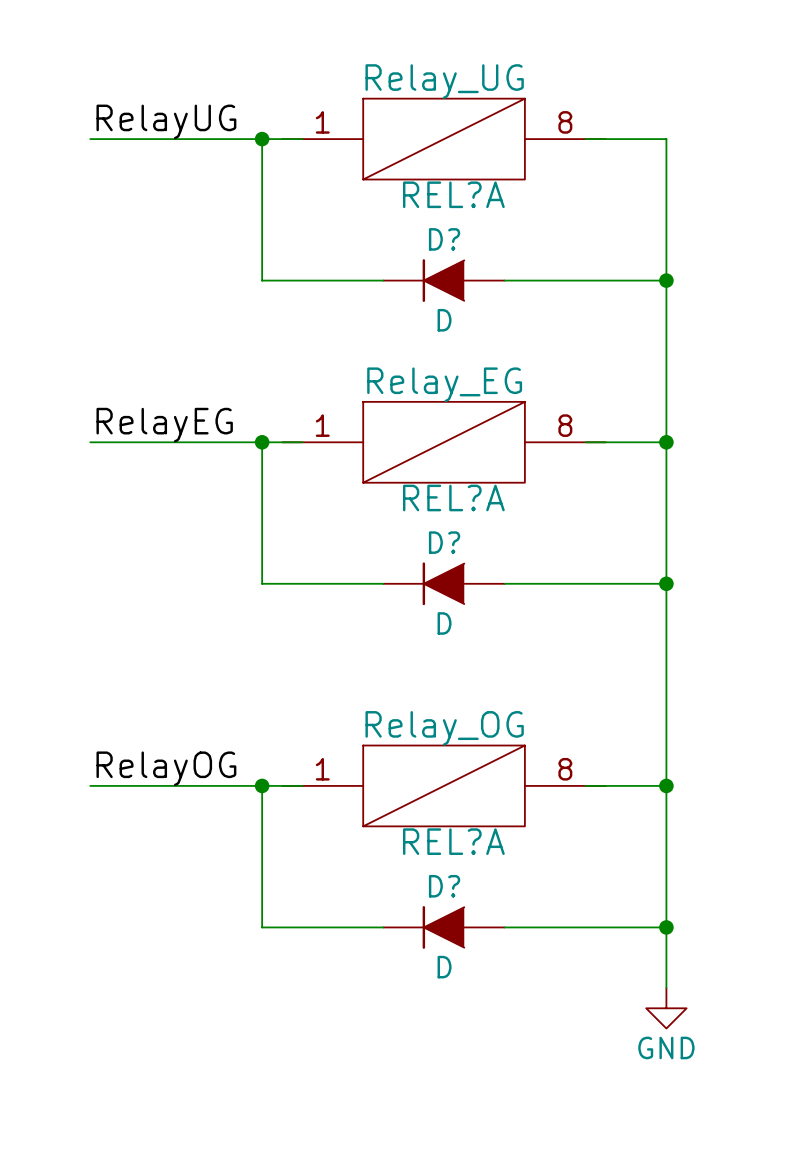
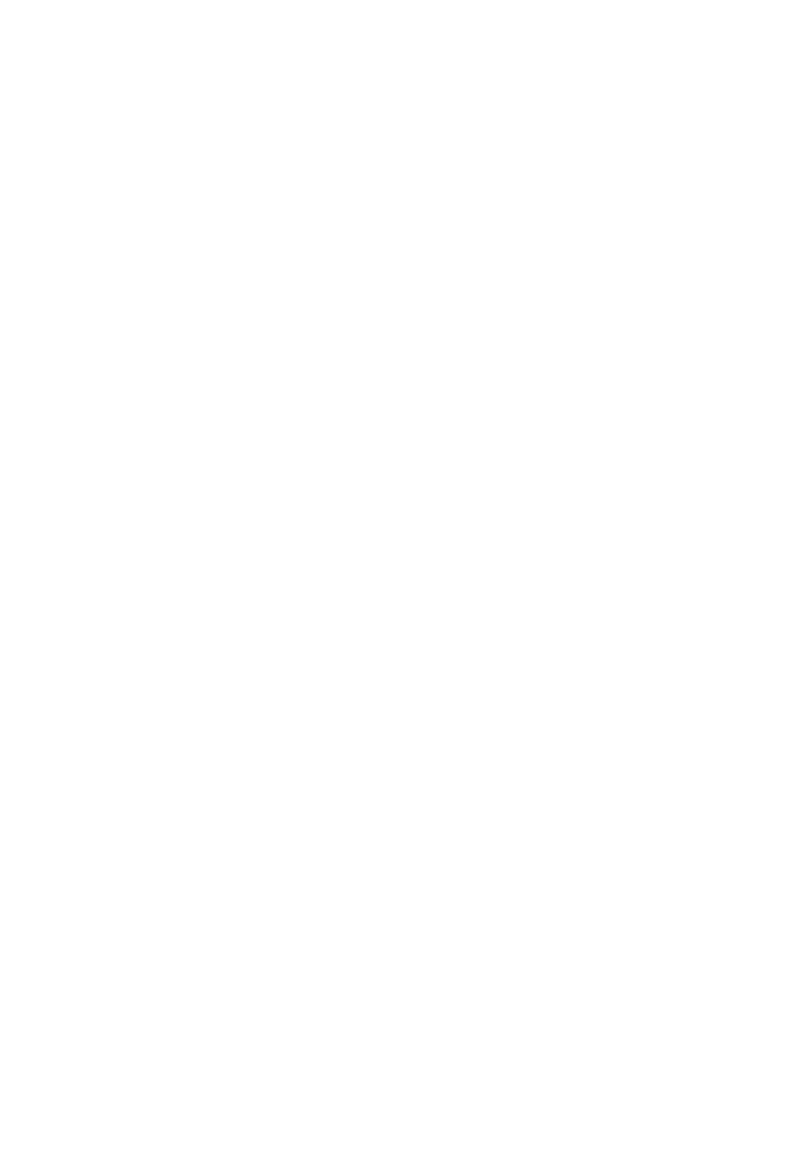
label: RelayUG (166, 121) -> none
wire: (90, 139) (302, 139) -> none
wire: (262, 139) (262, 280) (383, 280) -> none
junction: (262, 139) -> none
REL?A: Relay_UG (444, 139) -> none
wire: (585, 139) (666, 139) (666, 988) -> none
D?: D (444, 280) -> none
wire: (504, 280) (666, 280) -> none
junction: (666, 280) -> none
label: RelayEG (164, 425) -> none
wire: (90, 442) (302, 442) -> none
wire: (262, 442) (262, 583) (383, 583) -> none
junction: (262, 442) -> none
REL?A: Relay_EG (444, 442) -> none
wire: (585, 442) (666, 442) -> none
junction: (666, 442) -> none
D?: D (444, 583) -> none
wire: (504, 583) (666, 583) -> none
junction: (666, 583) -> none
label: RelayOG (166, 768) -> none
wire: (90, 785) (302, 785) -> none
wire: (262, 785) (262, 927) (383, 927) -> none
junction: (262, 785) -> none
REL?A: Relay_OG (444, 785) -> none
wire: (585, 785) (666, 785) -> none
junction: (666, 785) -> none
D?: D (444, 927) -> none
wire: (504, 927) (666, 927) -> none
junction: (666, 927) -> none
power symbol: GND (666, 1008) -> none

